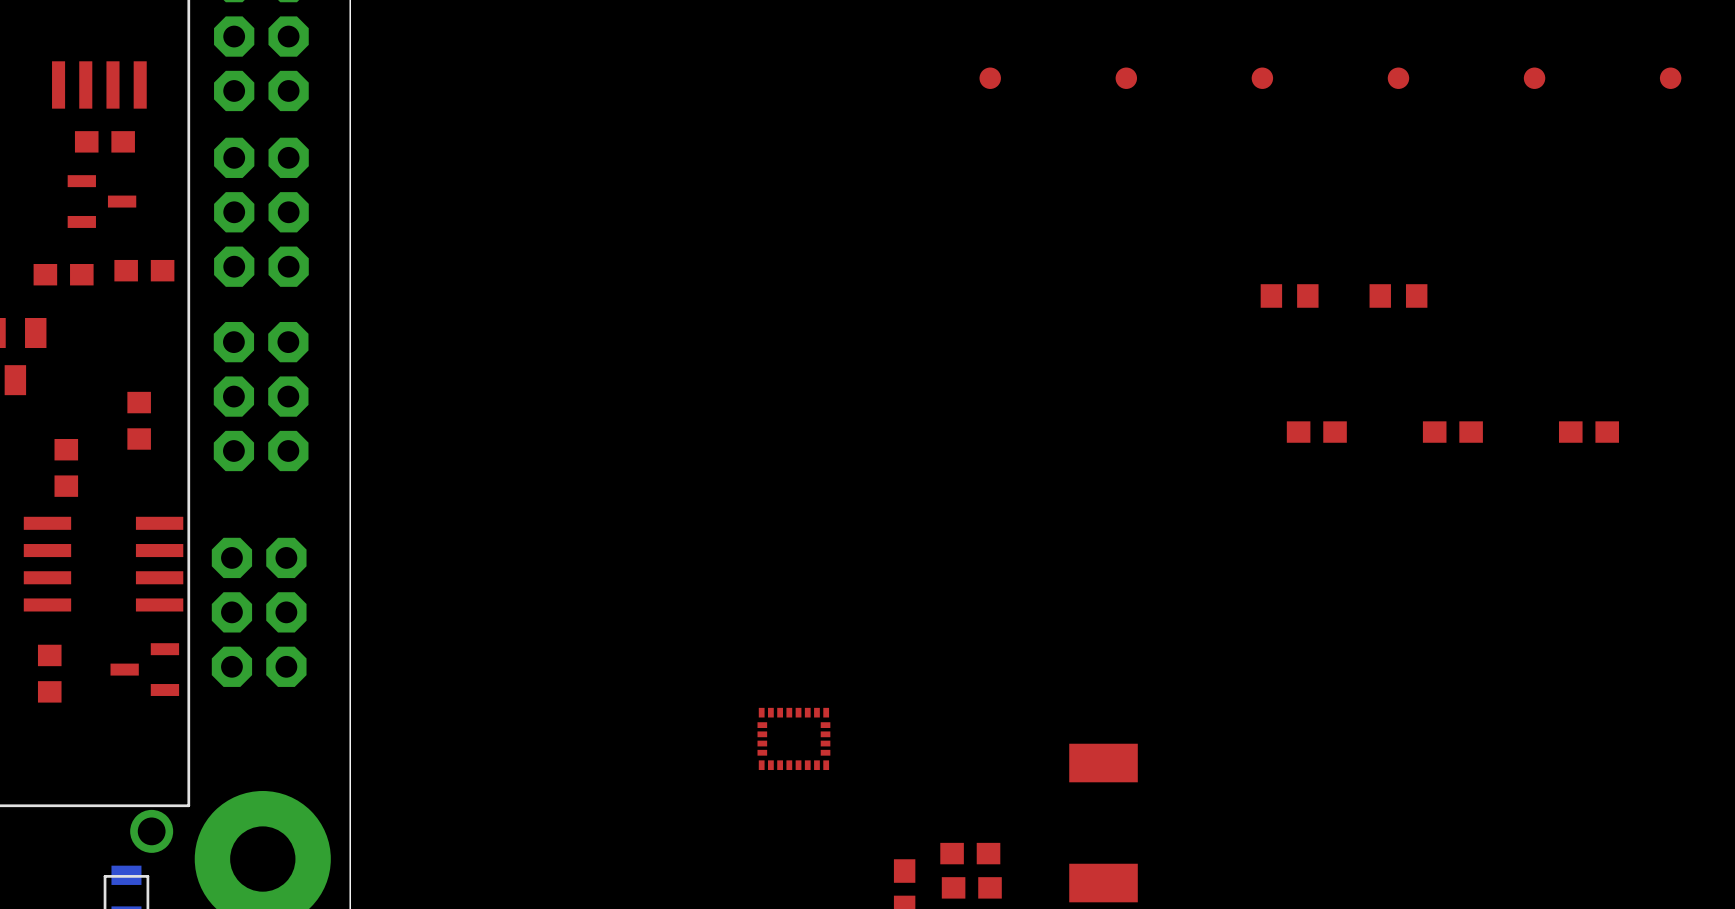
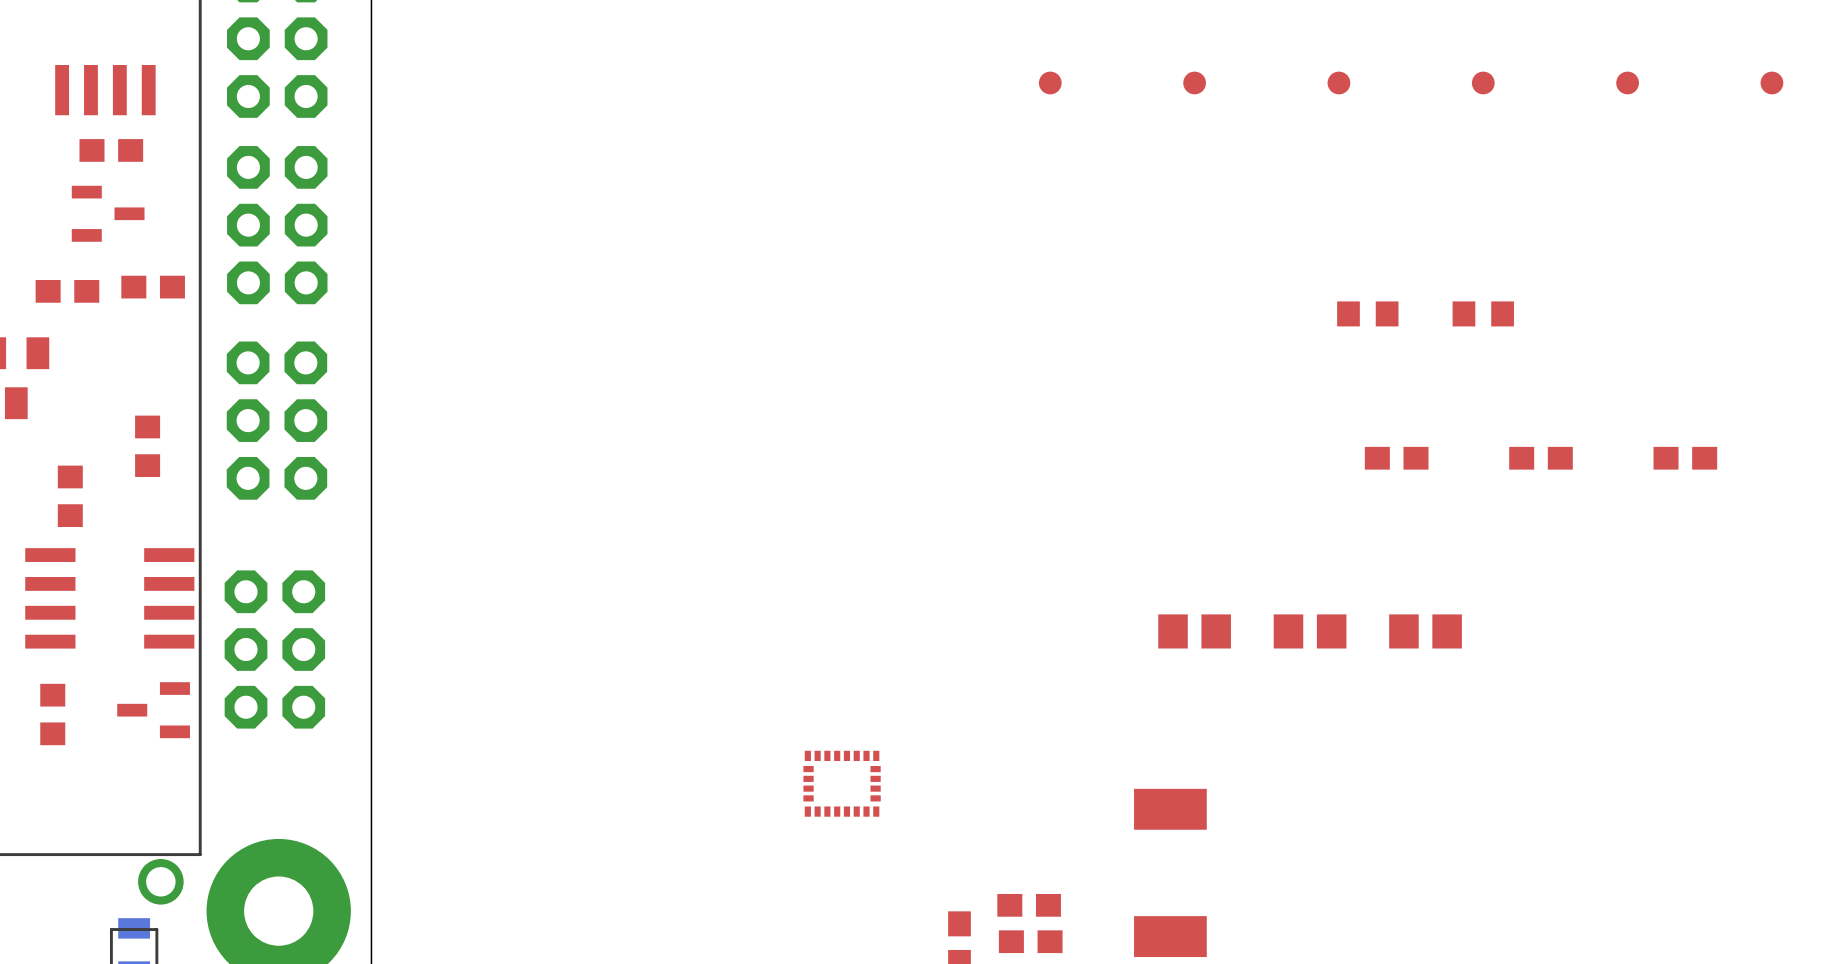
part: none -> (1194, 631)
part: none -> (1310, 631)
part: none -> (1425, 631)

